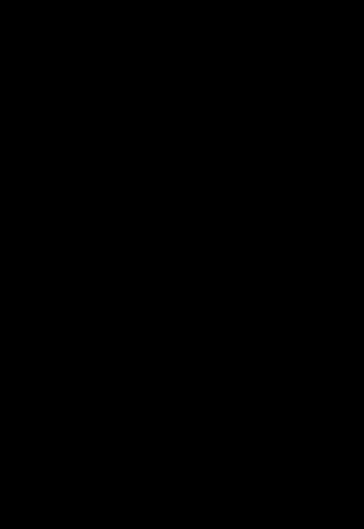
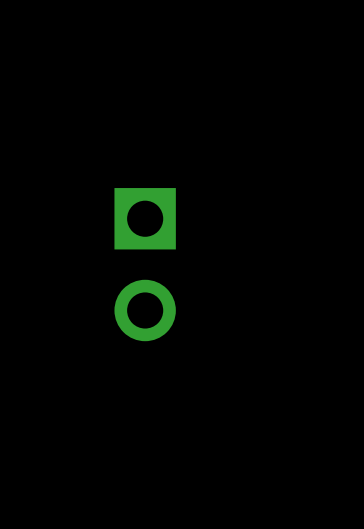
part: none -> (145, 264)

